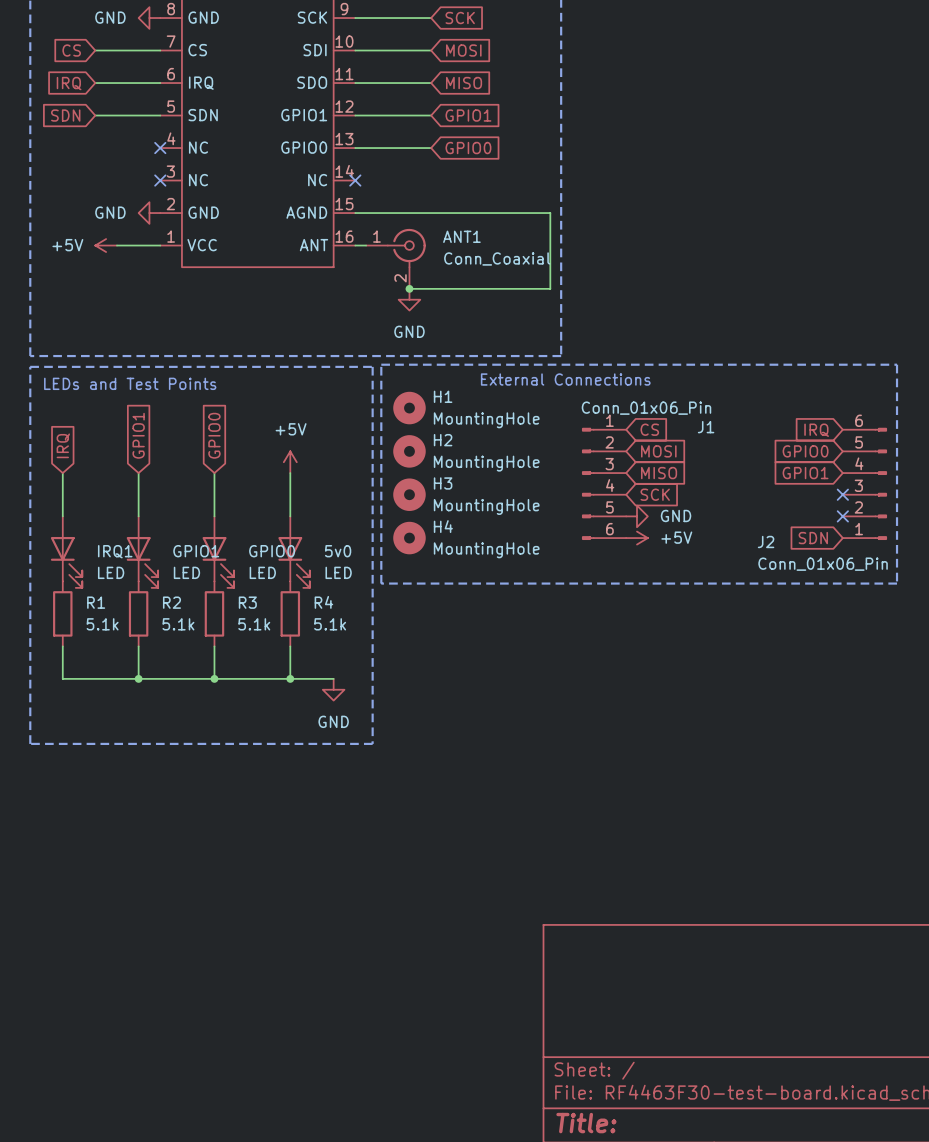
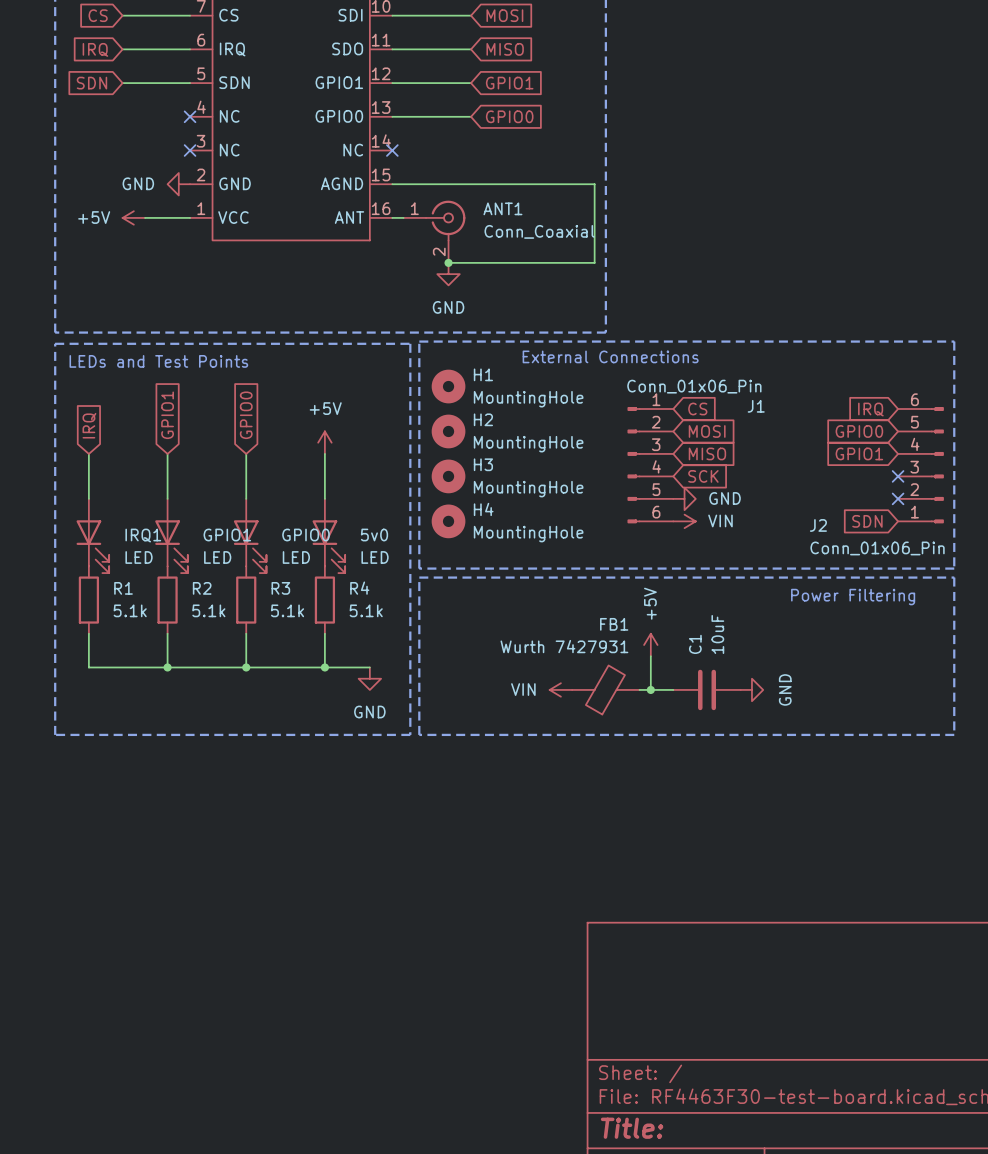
power symbol: +5V (637, 538) -> VIN (684, 521)
line: none -> (419, 577) (954, 577) (954, 734) (419, 734) (419, 577)
text: none -> Power Filtering (853, 597)
power symbol: none -> +5V (650, 645)
wire: none -> (650, 656) (650, 689)
power symbol: none -> VIN (560, 689)
FB1: none -> Wurth 7427931 (605, 689)
wire: none -> (639, 689) (673, 689)
junction: none -> (650, 689)
C1: none -> 10uF (707, 689)
power symbol: none -> GND (751, 689)

